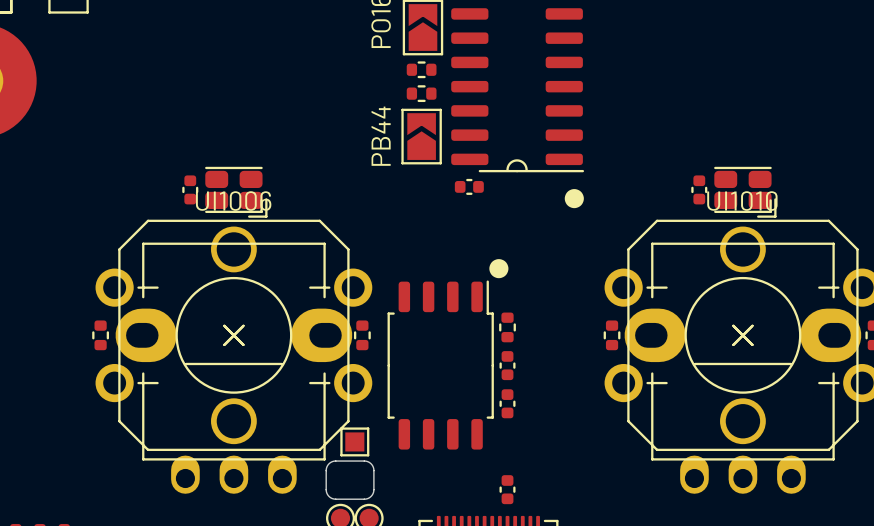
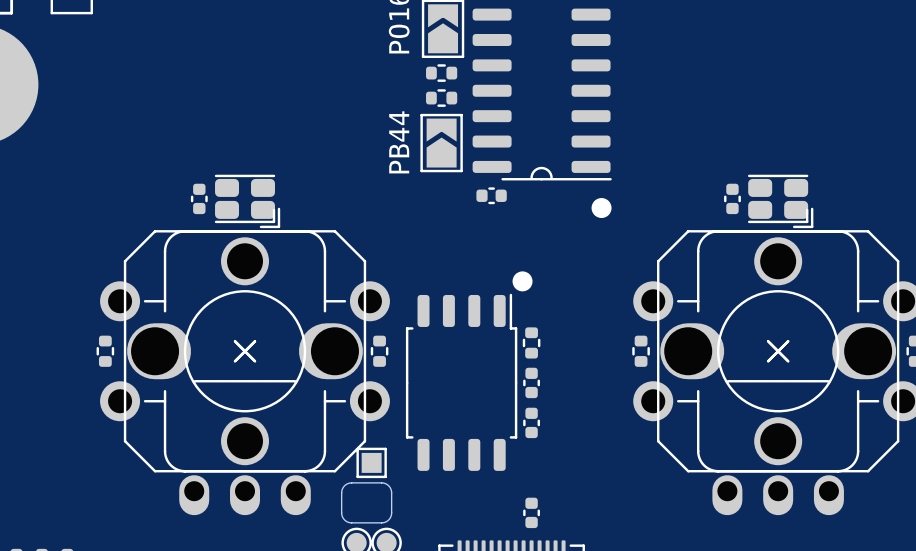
part: none -> (245, 372)
part: none -> (778, 372)
UI1006: (233, 368) -> none
UI1010: (742, 368) -> none

